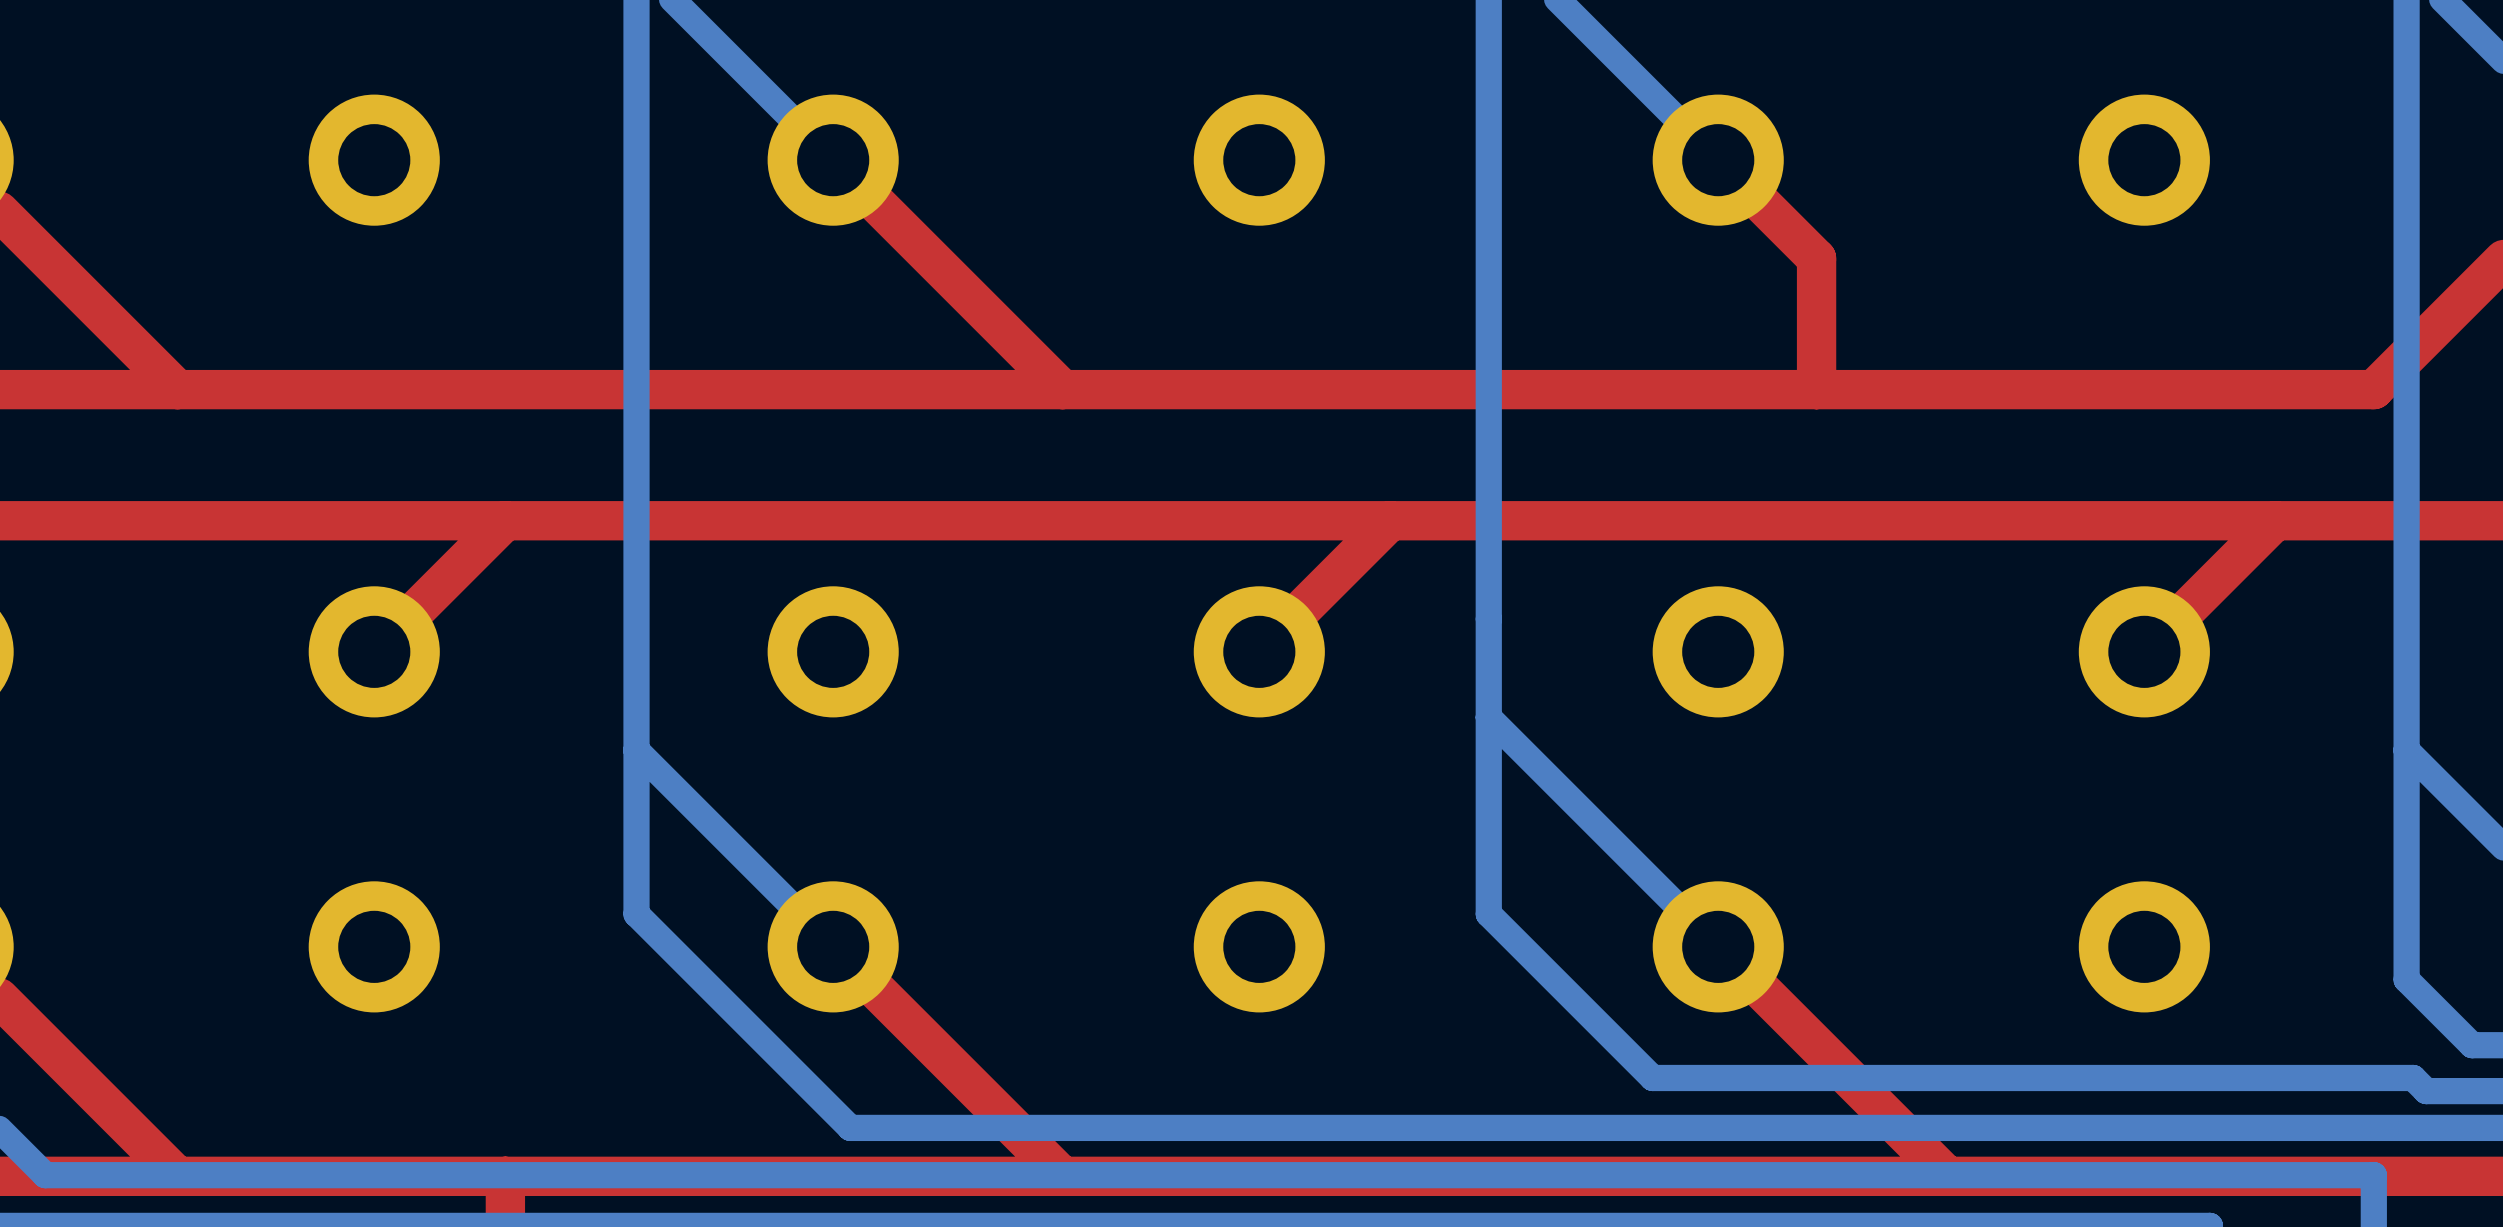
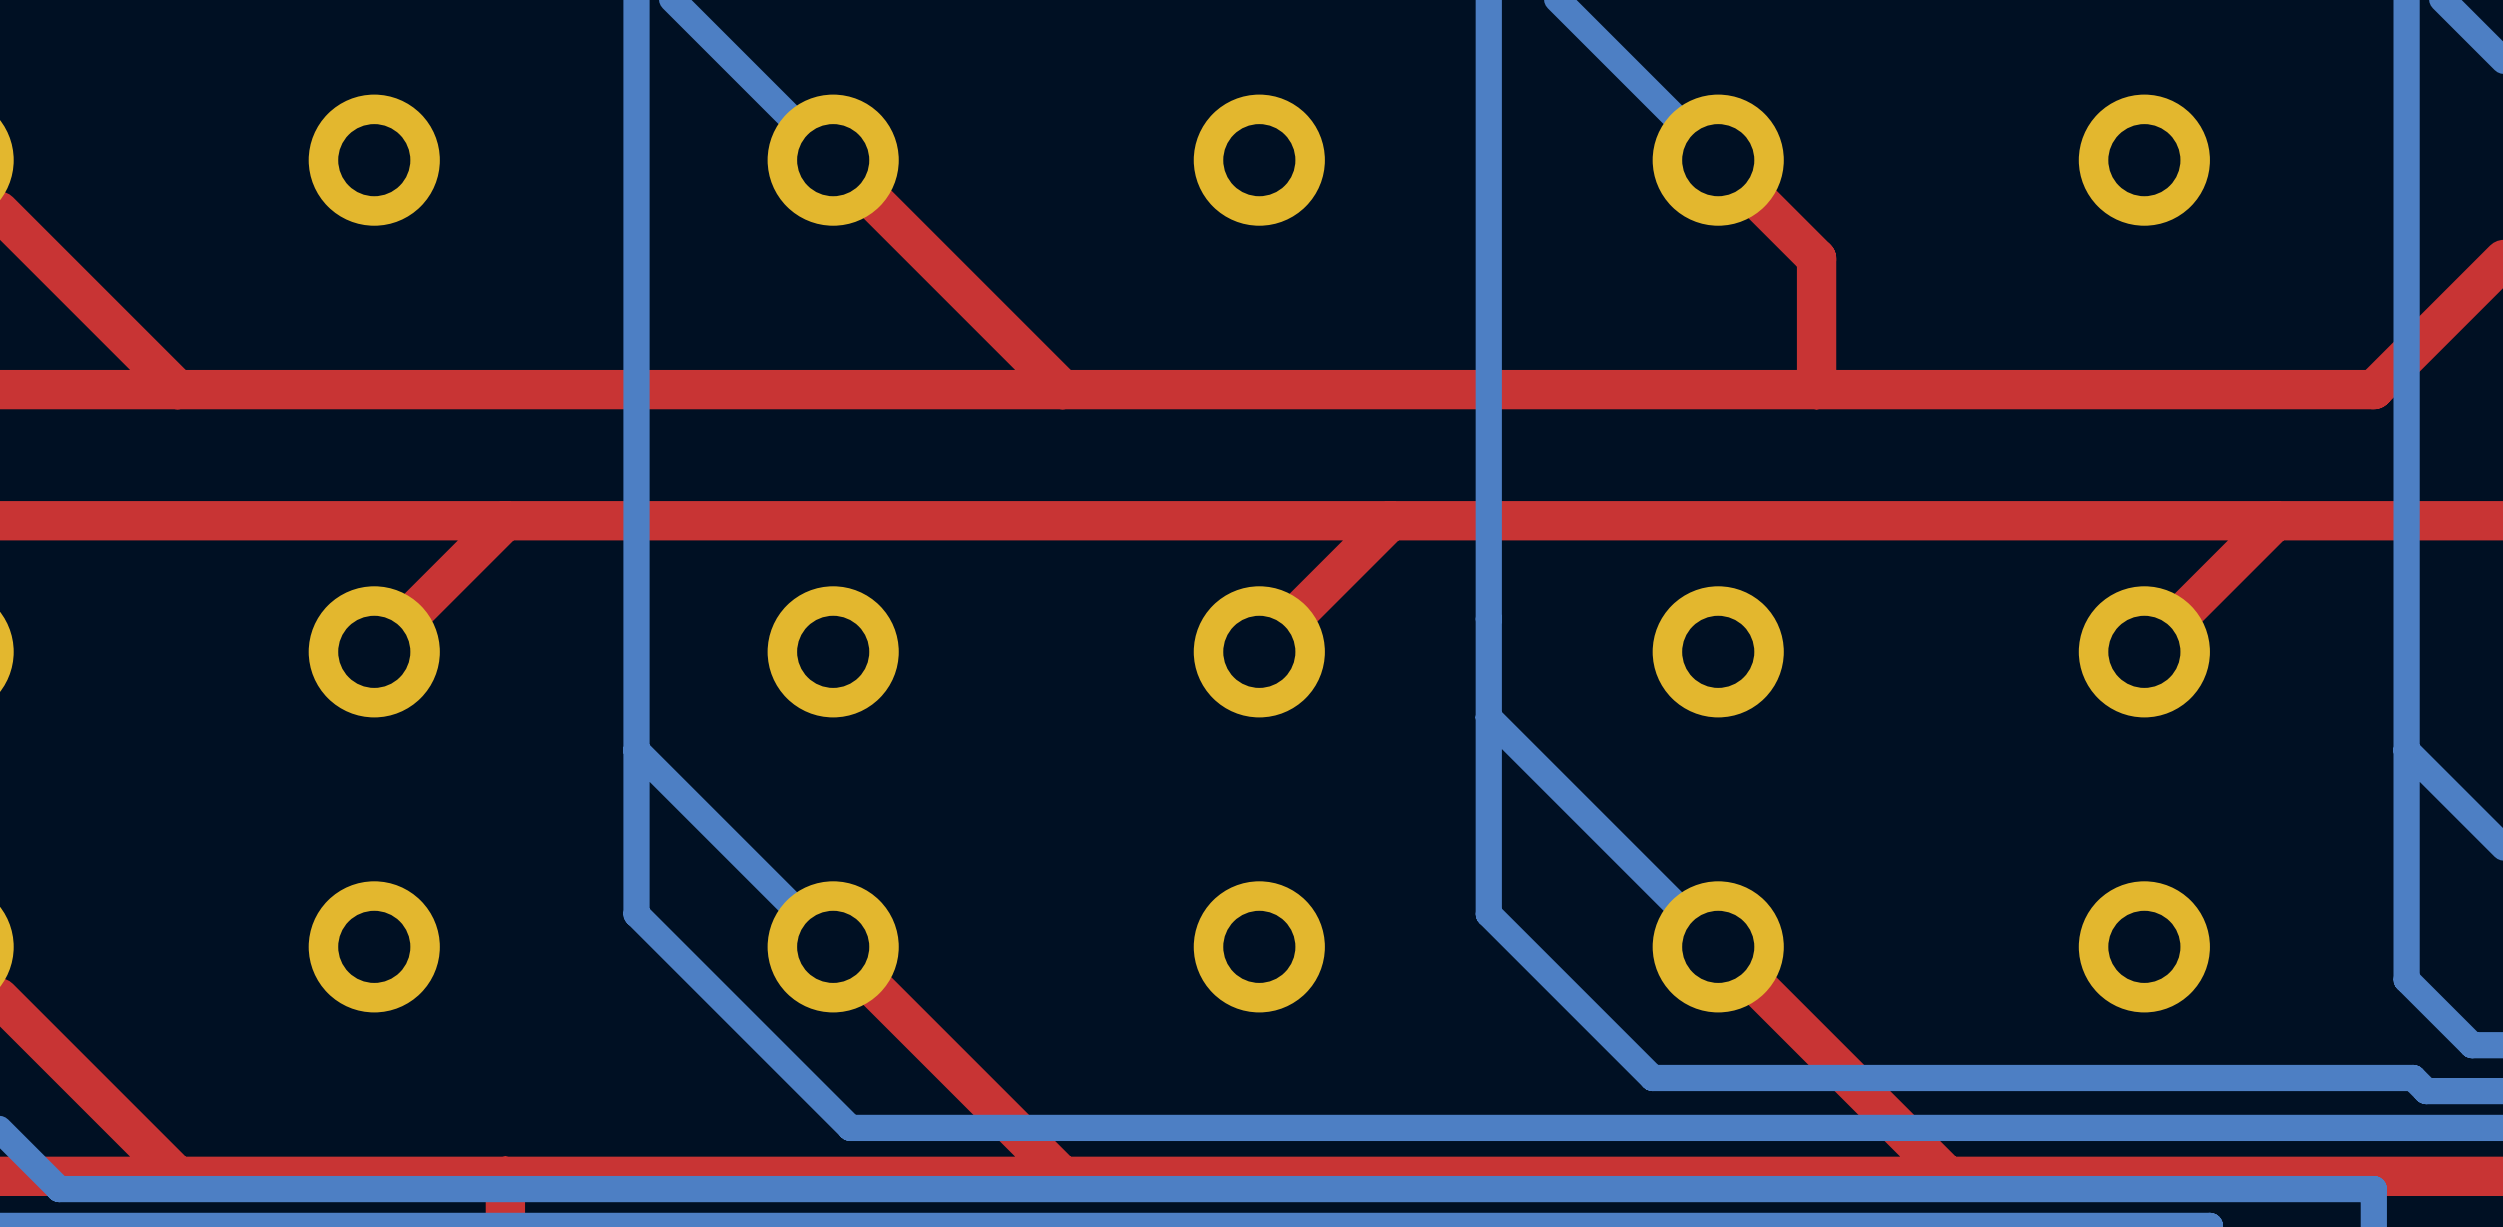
bottom track: (45, 1175) (2373, 1175) (2373, 1189) -> (45, 1175) (59, 1189) (2373, 1189)

